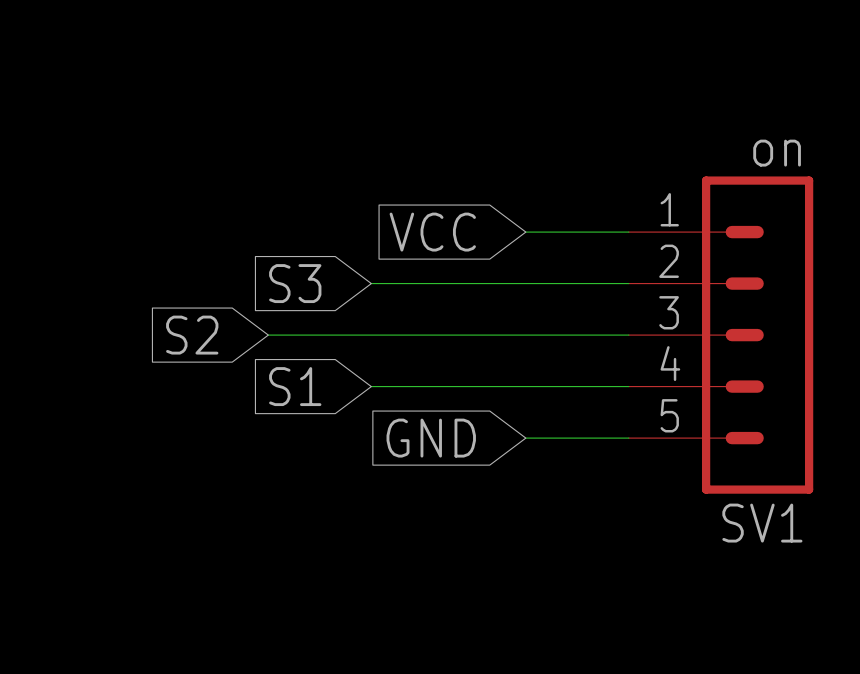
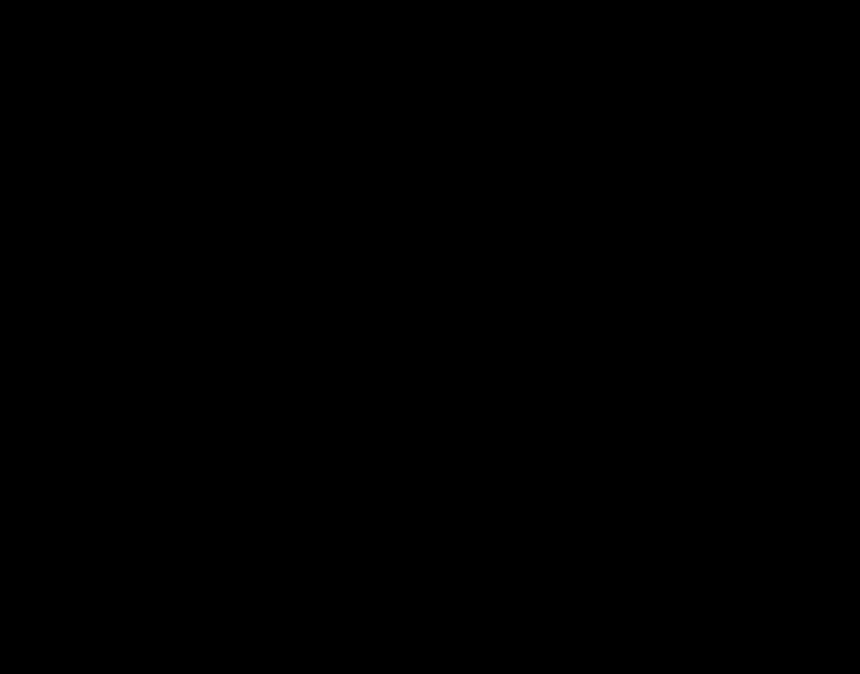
global label: VCC (432, 232) -> none
wire: (525, 232) (628, 232) -> none
global label: S3 (295, 283) -> none
wire: (371, 283) (628, 283) -> none
global label: S2 (192, 335) -> none
wire: (268, 335) (628, 335) -> none
SV1: on (721, 335) -> none
global label: S1 (295, 386) -> none
wire: (371, 386) (628, 386) -> none
global label: GND (431, 438) -> none
wire: (525, 438) (628, 438) -> none

